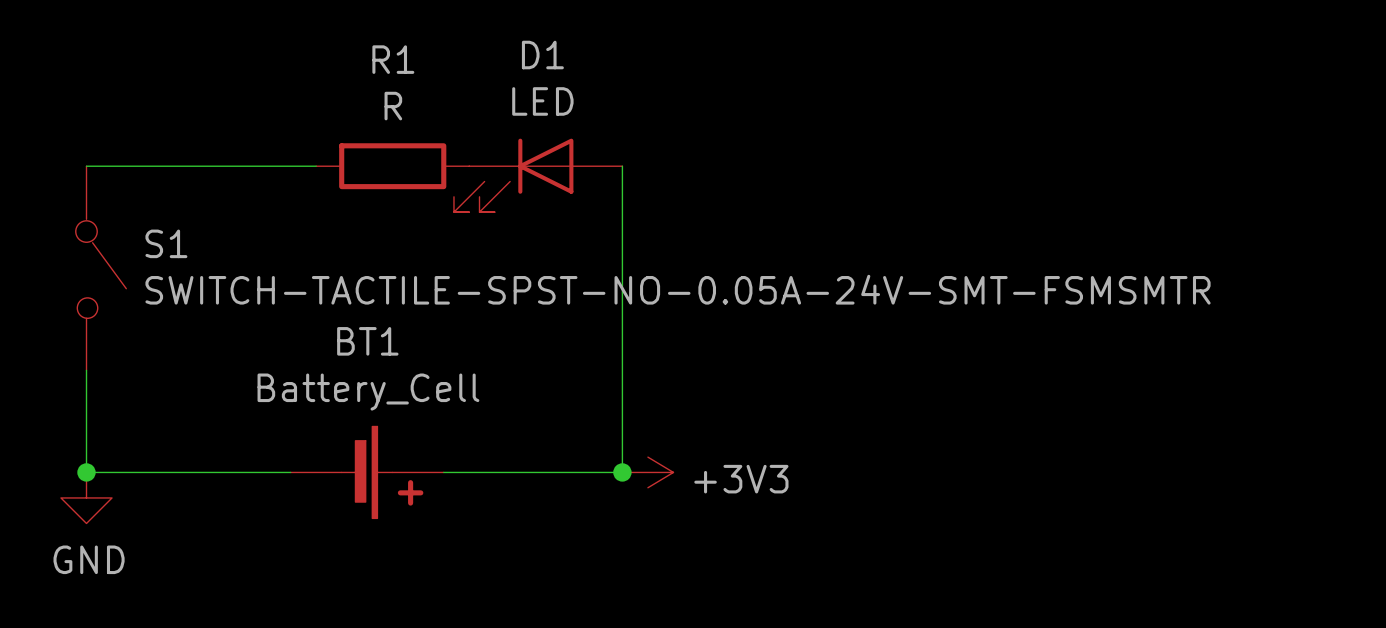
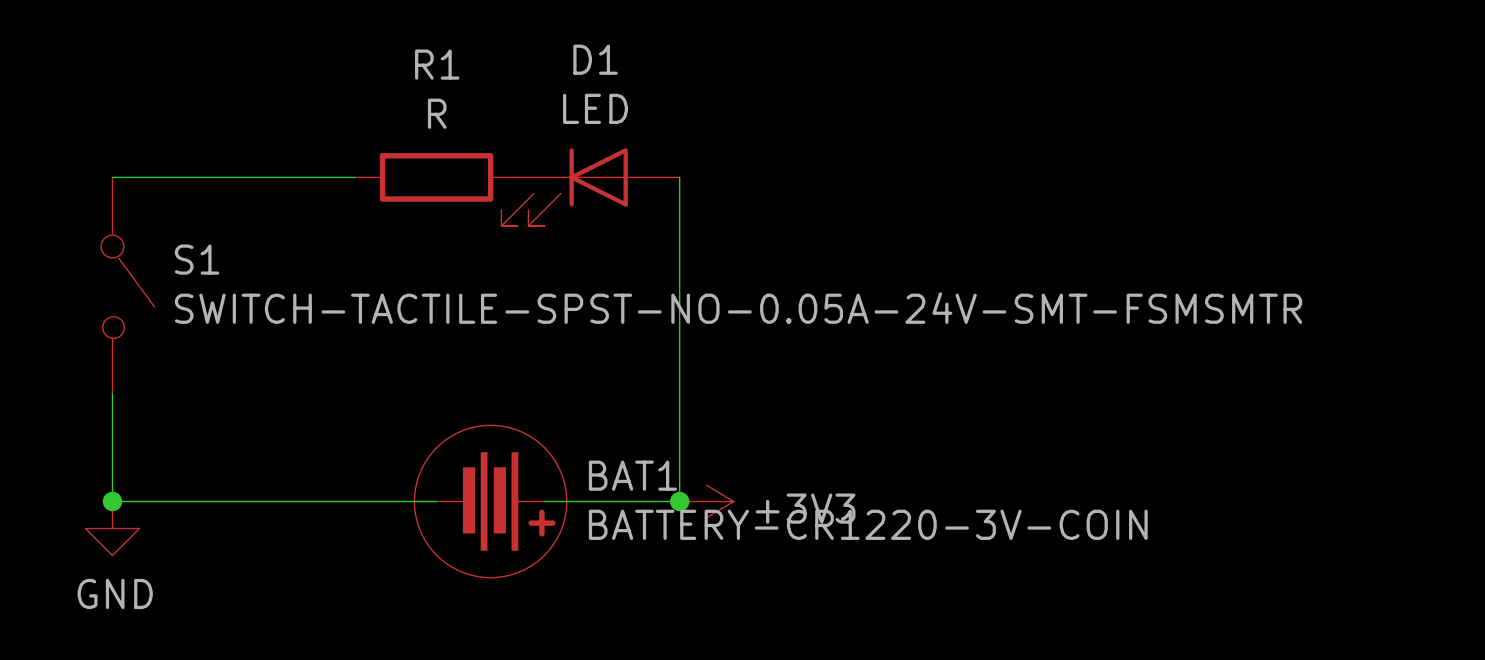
BT1: Battery_Cell (367, 472) -> none
BAT1: none -> BATTERY-CR1220-3V-COIN (490, 501)

